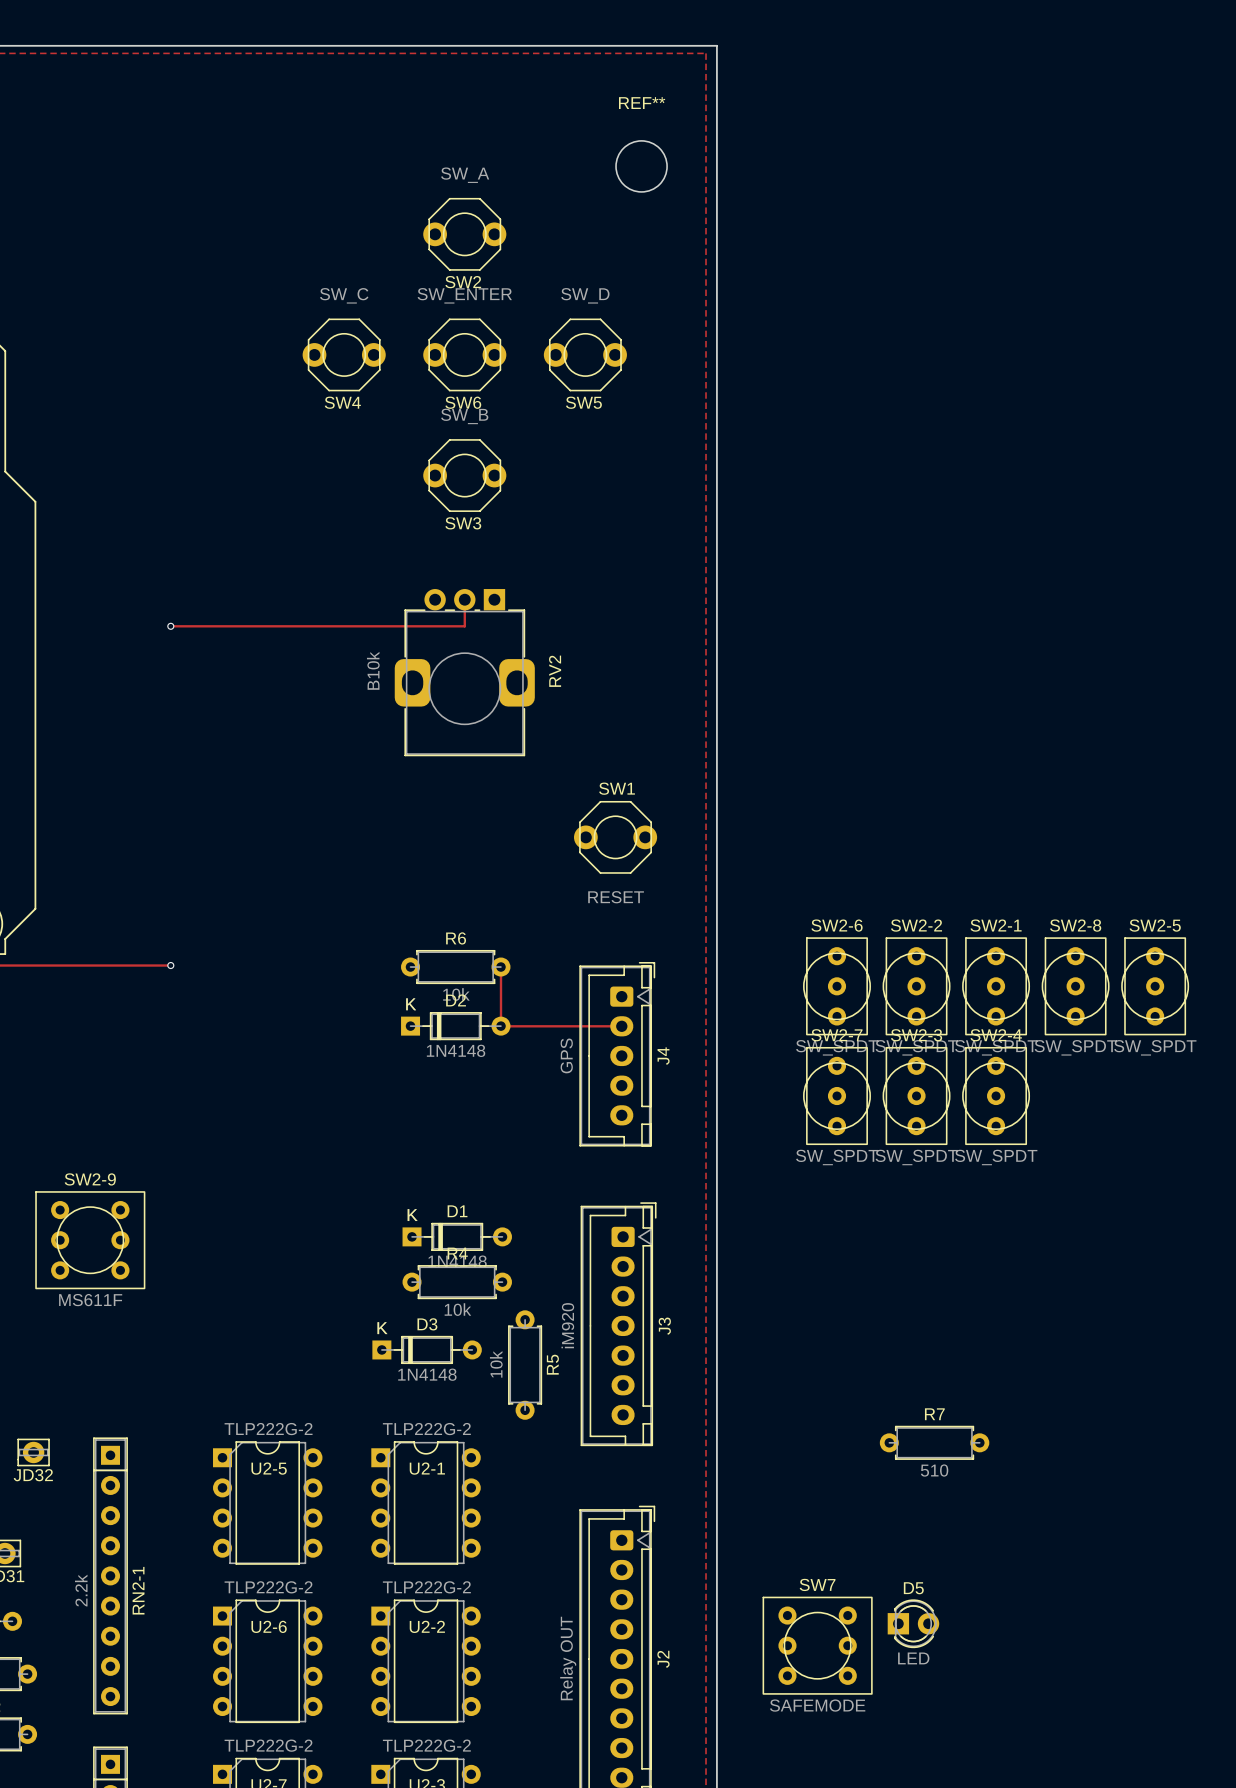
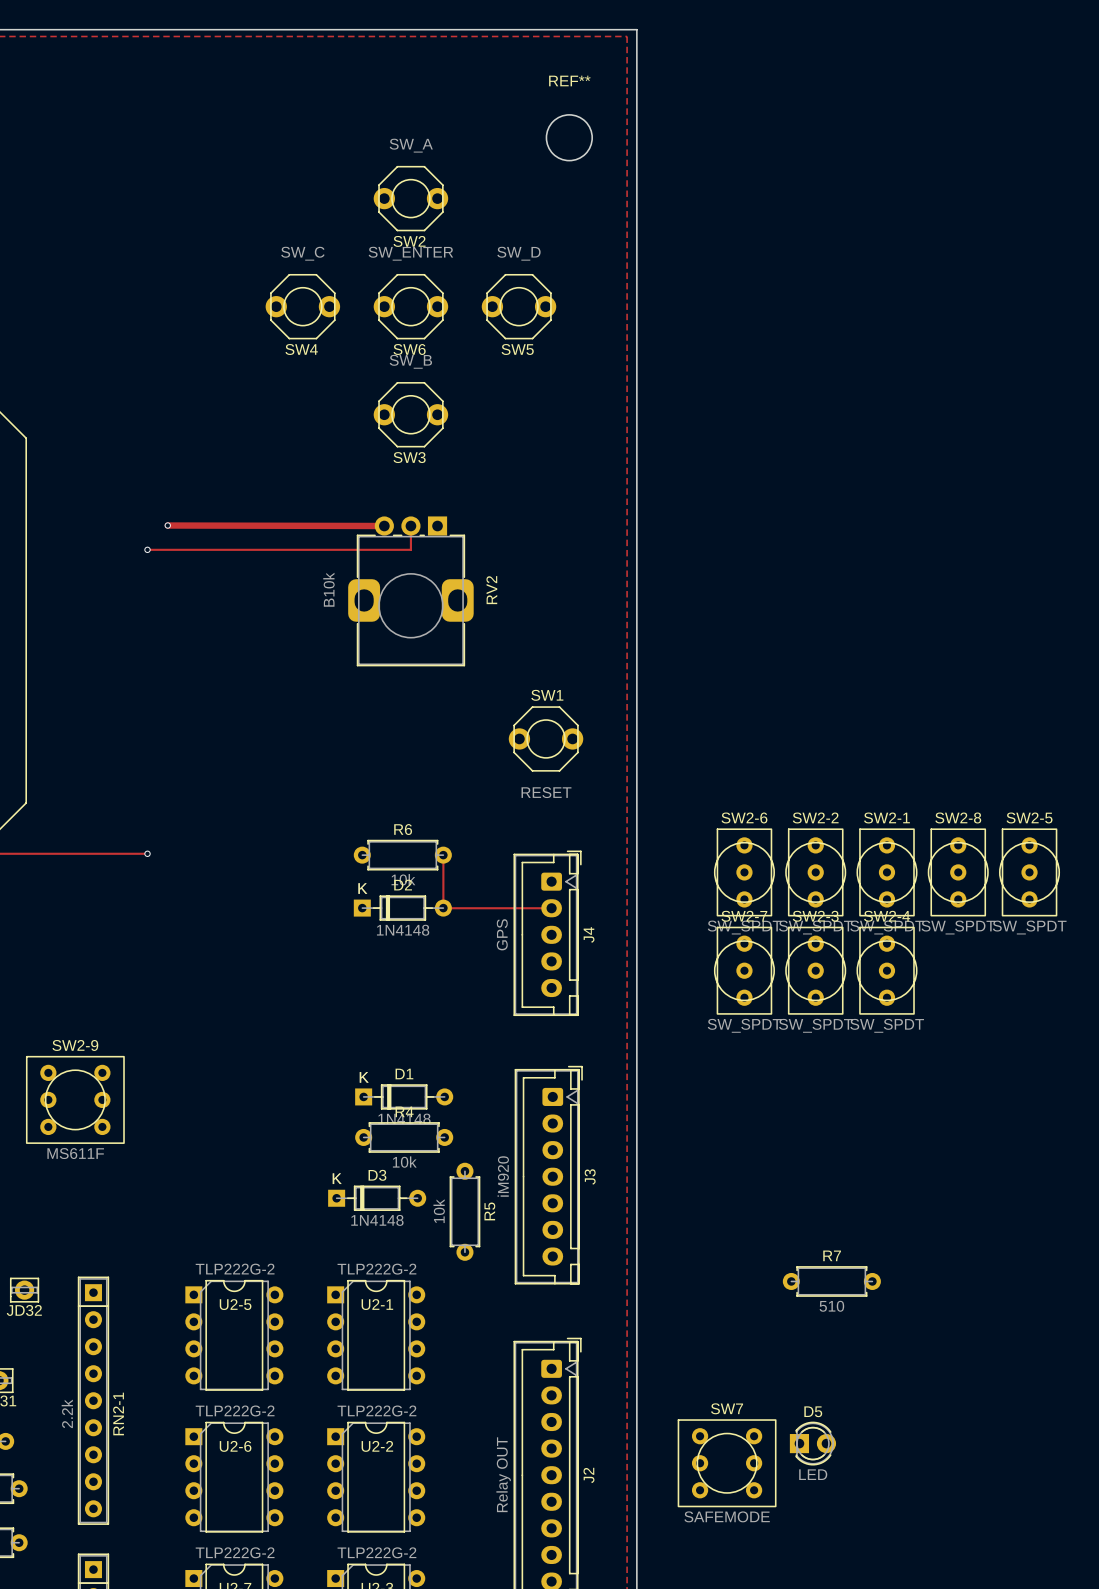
track: none -> (167, 525) (384, 526)
via: none -> (167, 525)

